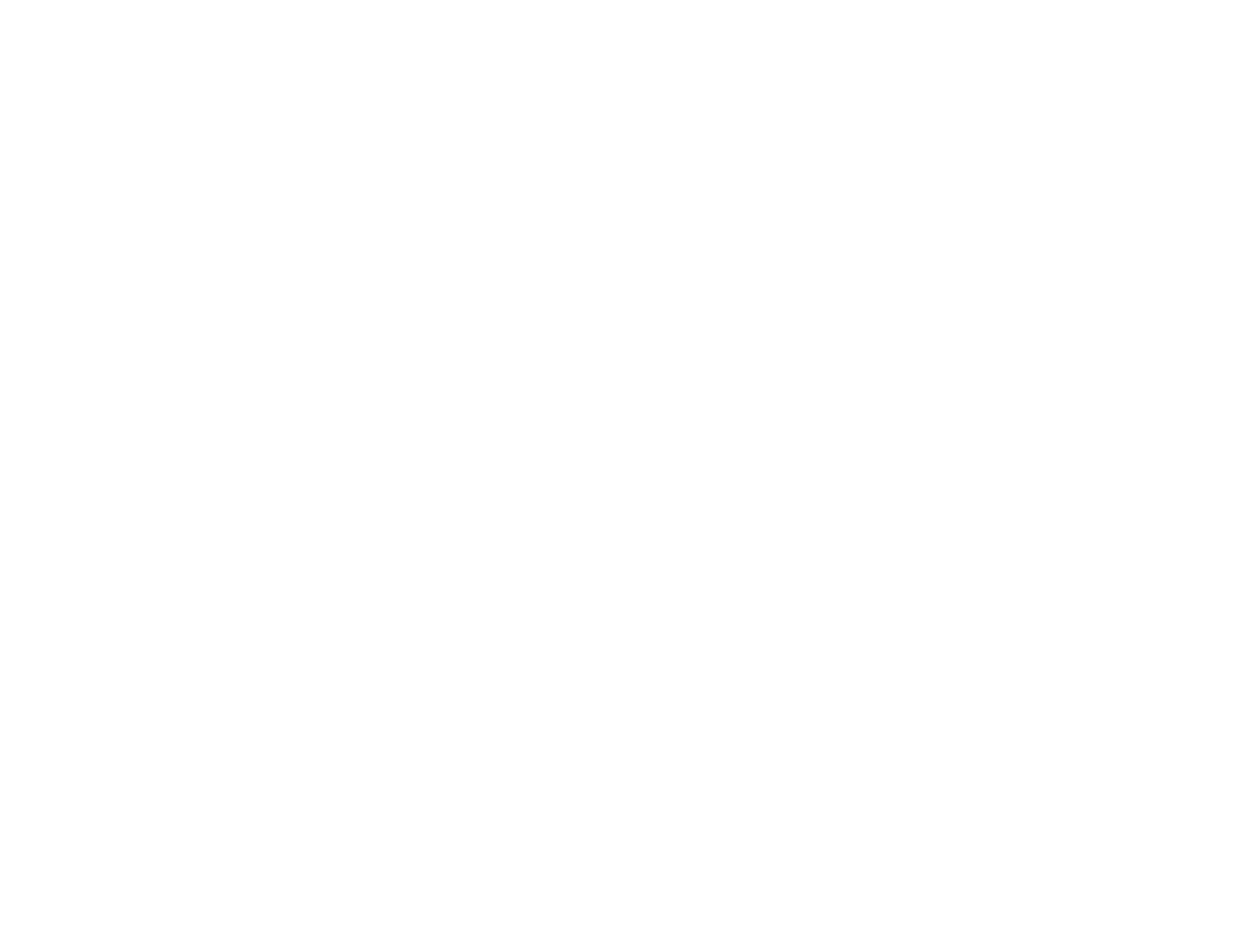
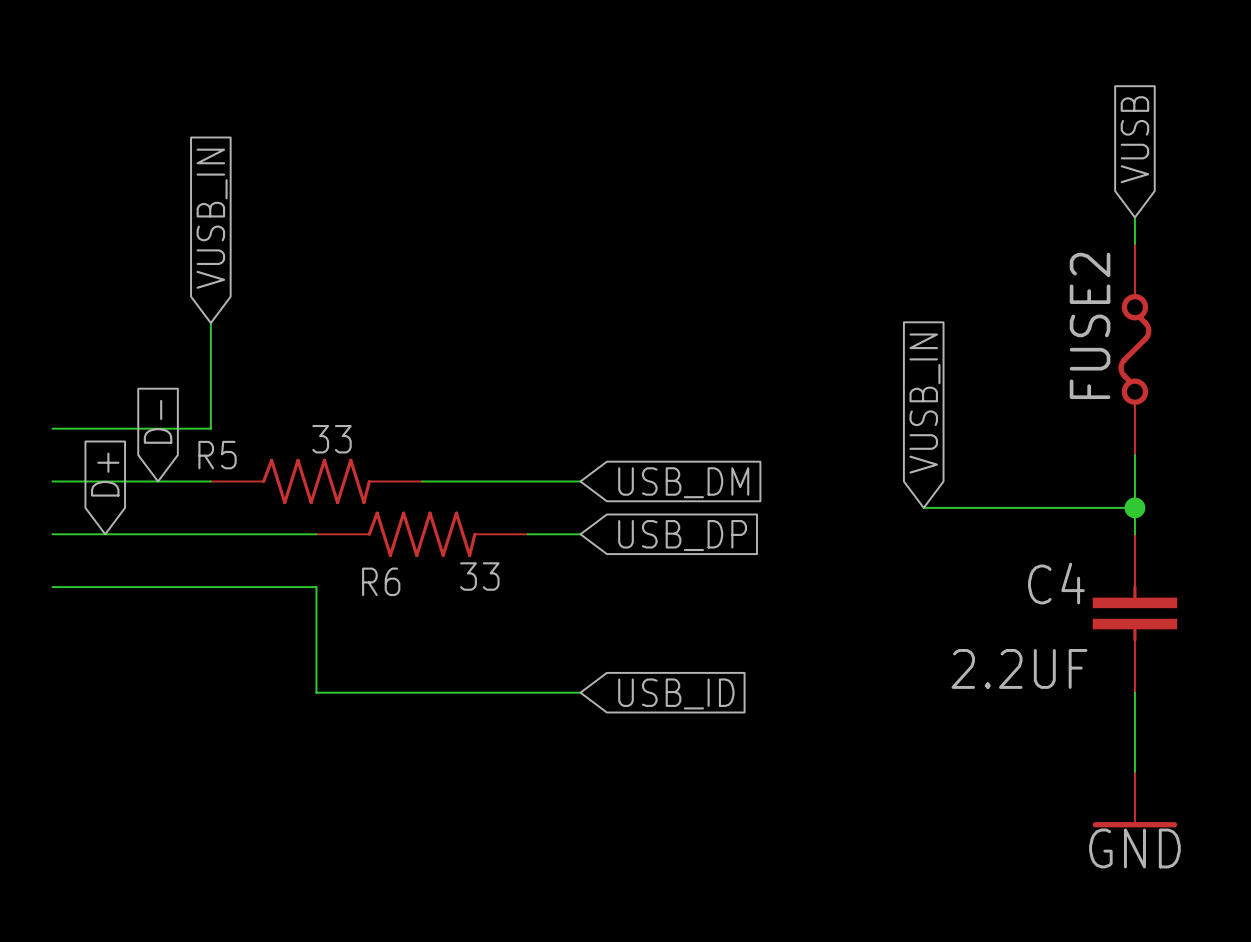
global label: none -> VUSB (1134, 139)
wire: none -> (1134, 217) (1134, 243)
global label: none -> VUSB_IN (212, 218)
wire: none -> (210, 323) (210, 428) (52, 428)
FUSE2: none -> (1134, 349)
global label: none -> VUSB_IN (924, 403)
global label: none -> D- (158, 421)
wire: none -> (1134, 455) (1134, 534)
global label: none -> D+ (105, 474)
wire: none -> (52, 481) (210, 481)
R5: none -> 33 (316, 481)
wire: none -> (422, 481) (580, 481)
global label: none -> USB_DM (683, 482)
wire: none -> (923, 507) (1134, 507)
junction: none -> (1134, 507)
wire: none -> (52, 534) (316, 534)
R6: none -> 33 (422, 534)
wire: none -> (527, 534) (580, 534)
global label: none -> USB_DP (682, 535)
wire: none -> (52, 587) (316, 587) (316, 692) (580, 692)
C4: none -> 2.2UF (1134, 613)
wire: none -> (1134, 692) (1134, 771)
global label: none -> USB_ID (676, 693)
power symbol: none -> GND (1134, 799)

